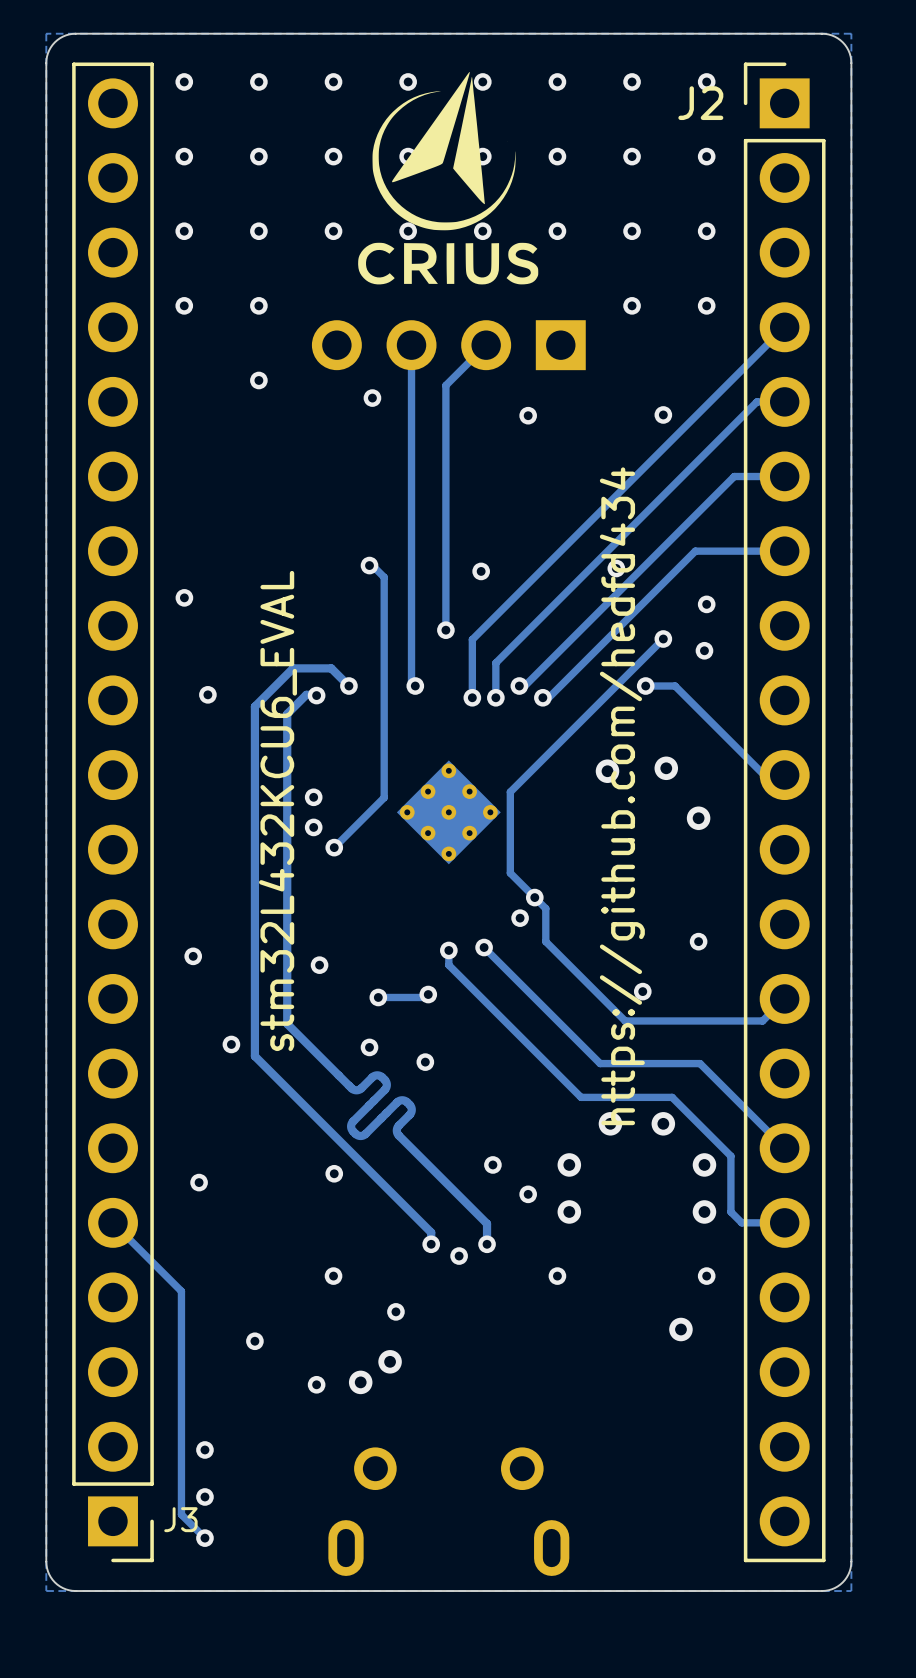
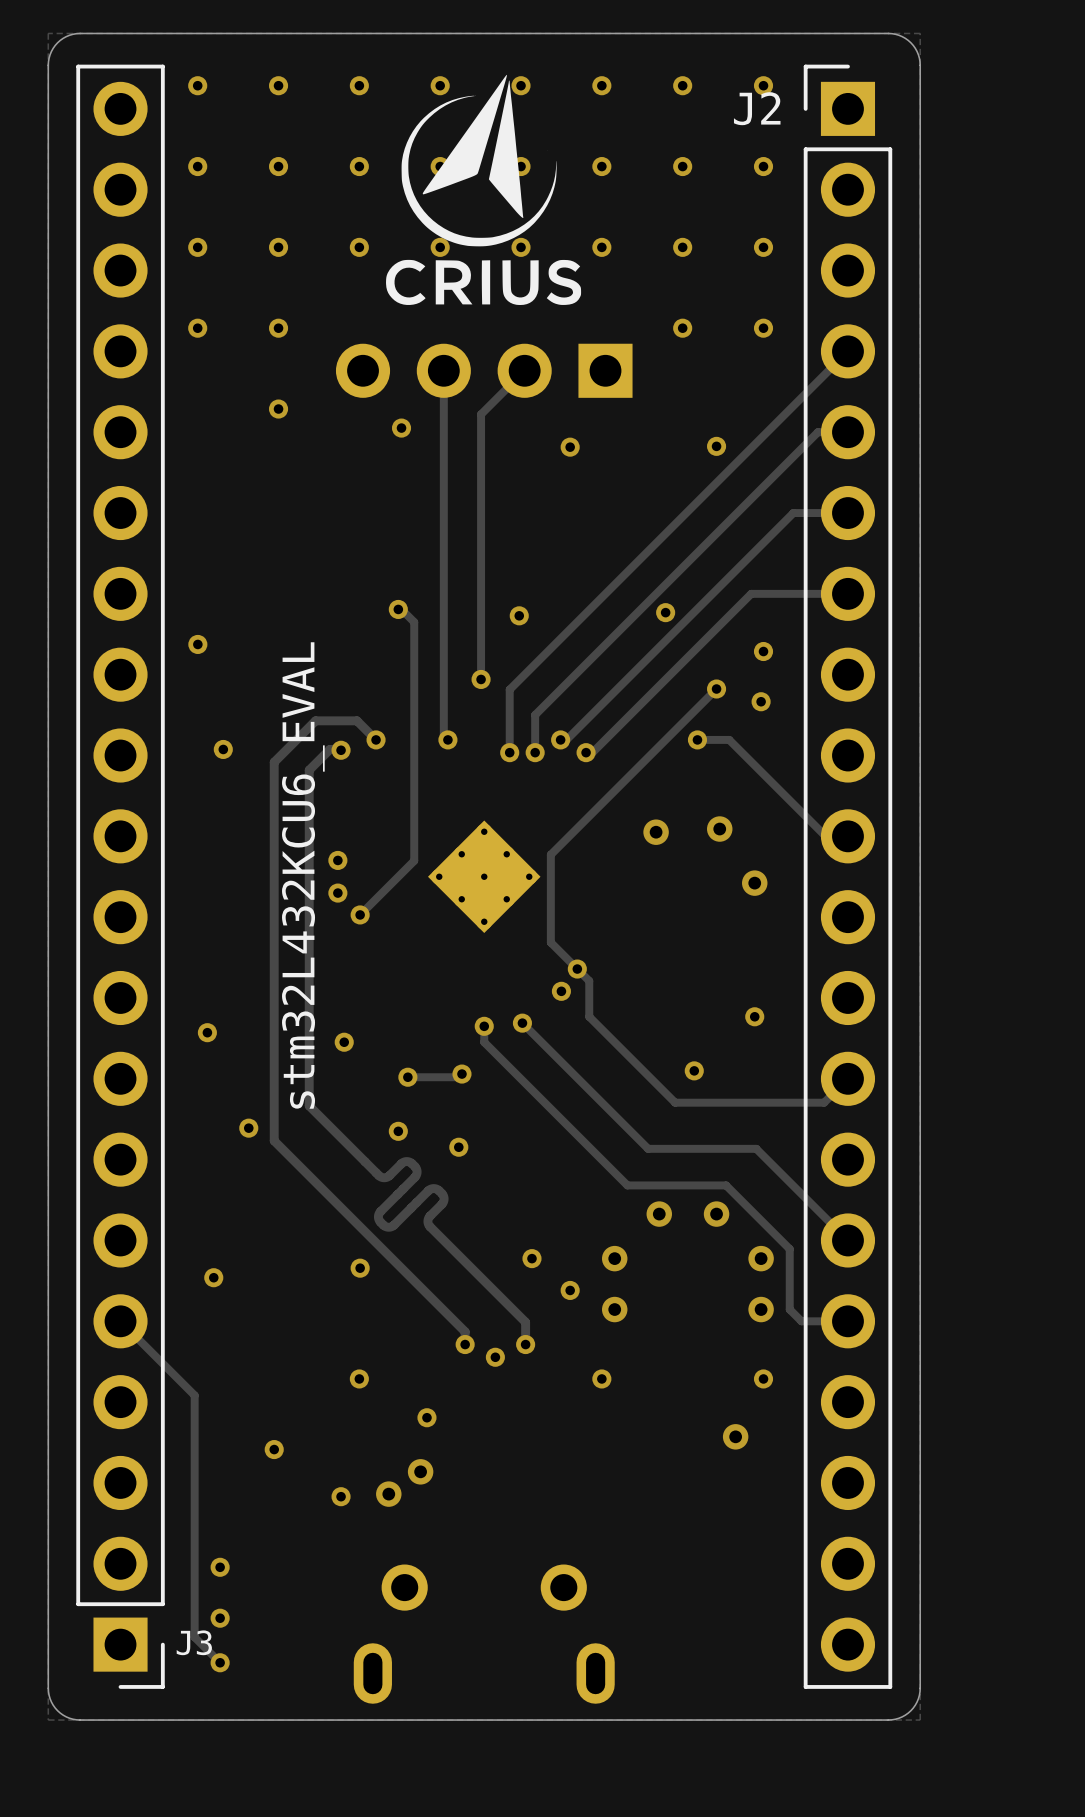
text: https://github.com/hedfd434 (622, 796) -> none

